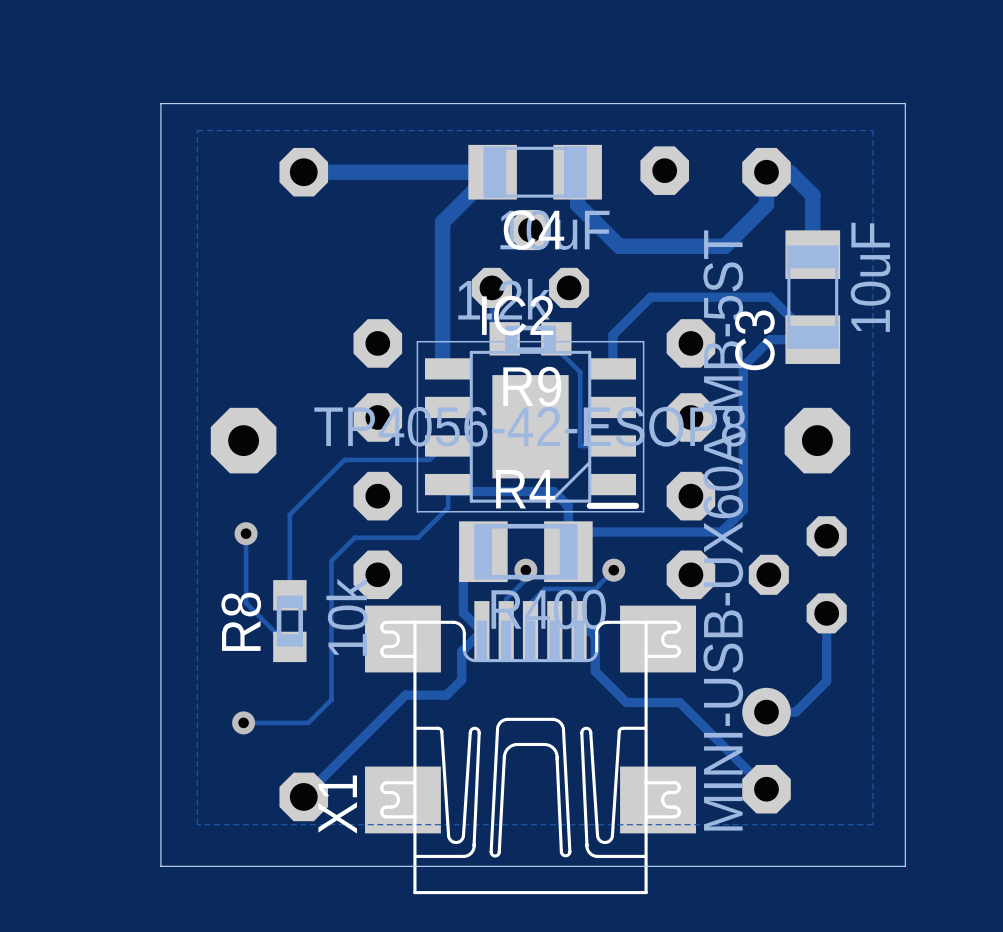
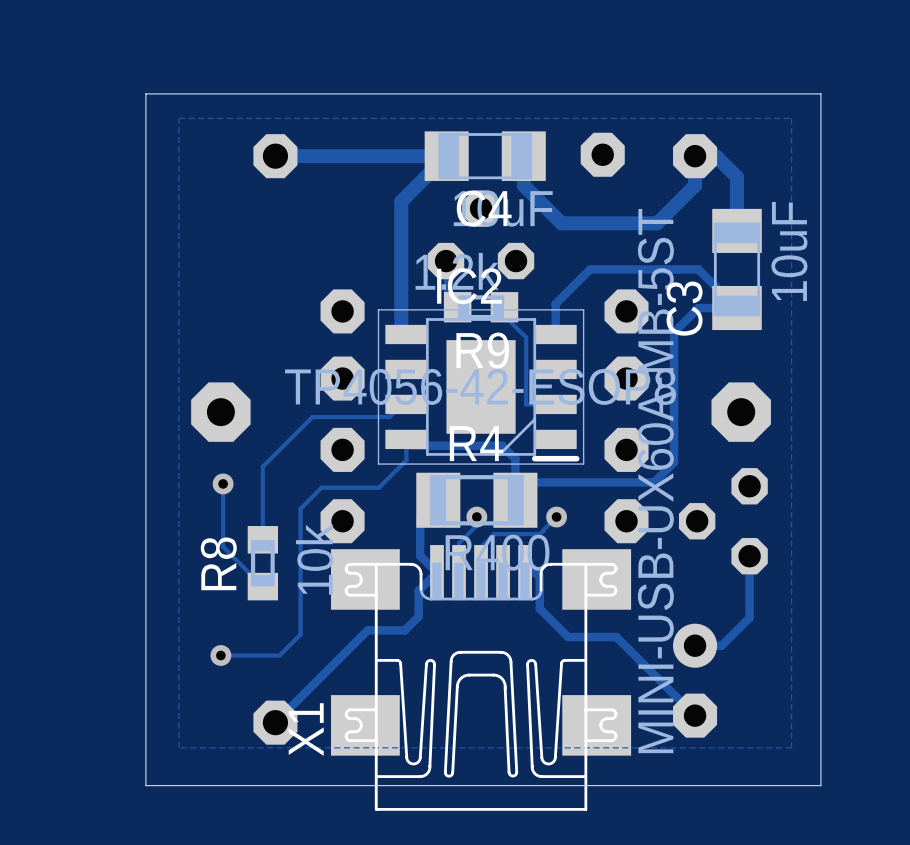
part position: (243, 440) -> (220, 412)
part position: (817, 440) -> (741, 412)

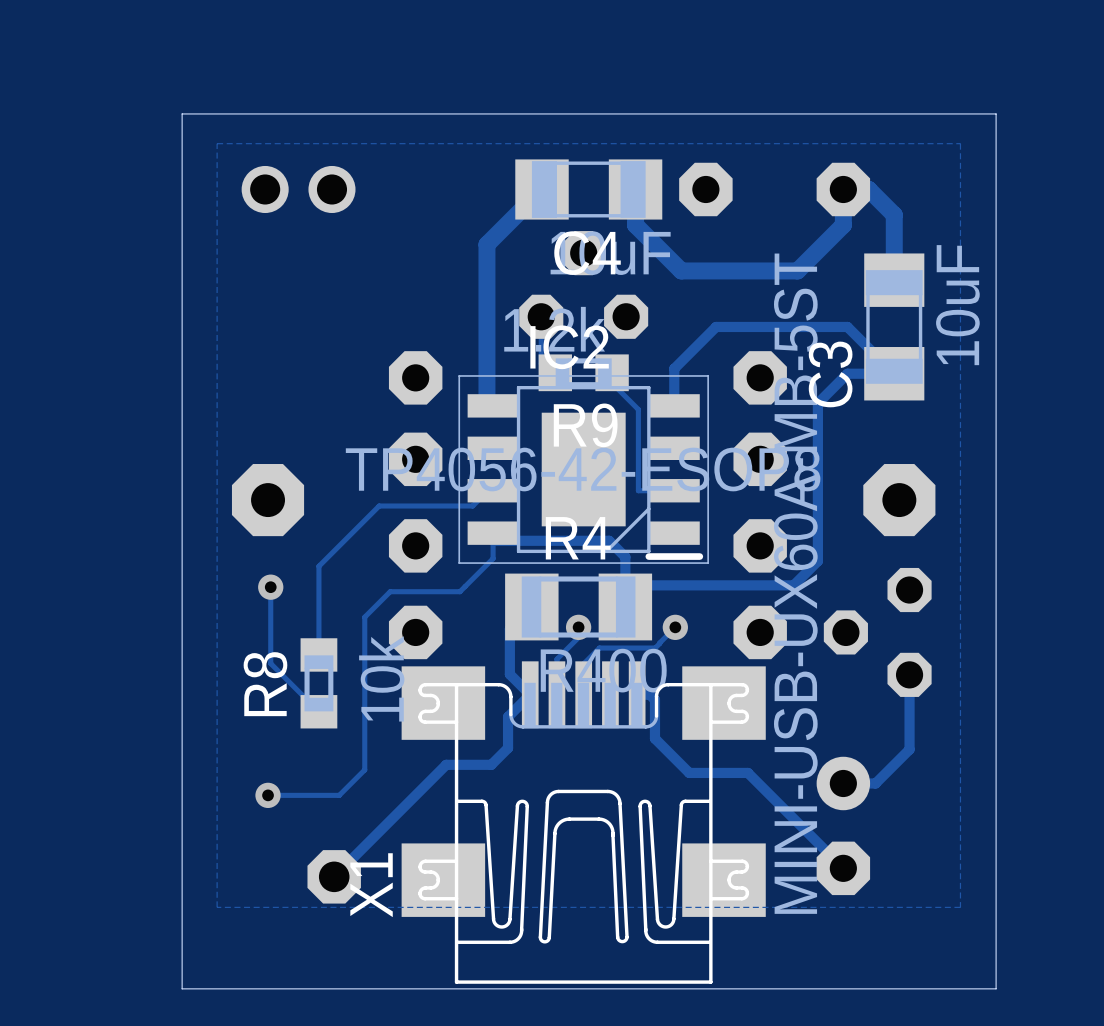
board edge: (150, 93) (145, 93) (145, 785) (820, 785) -> (182, 113) (182, 988) (996, 988) (996, 953)
part position: (602, 154) -> (705, 189)
part: none -> (298, 189)
part: (275, 156) -> none
track: (446, 156) (275, 156) -> none

